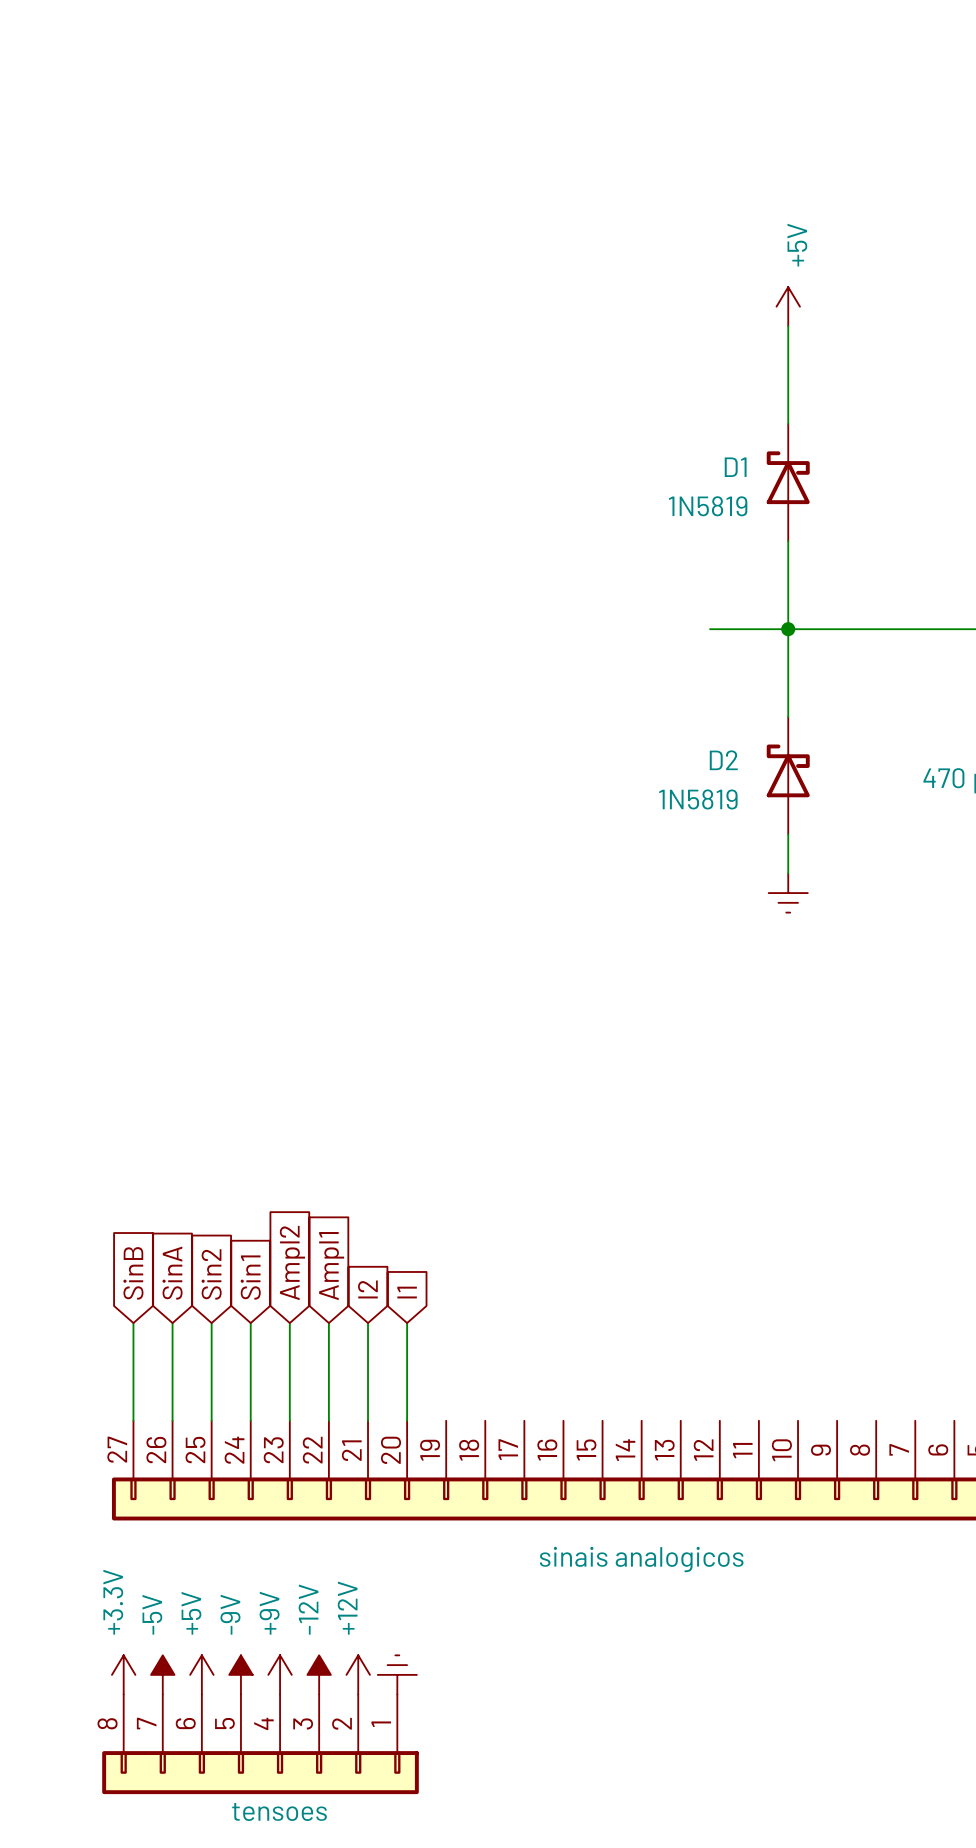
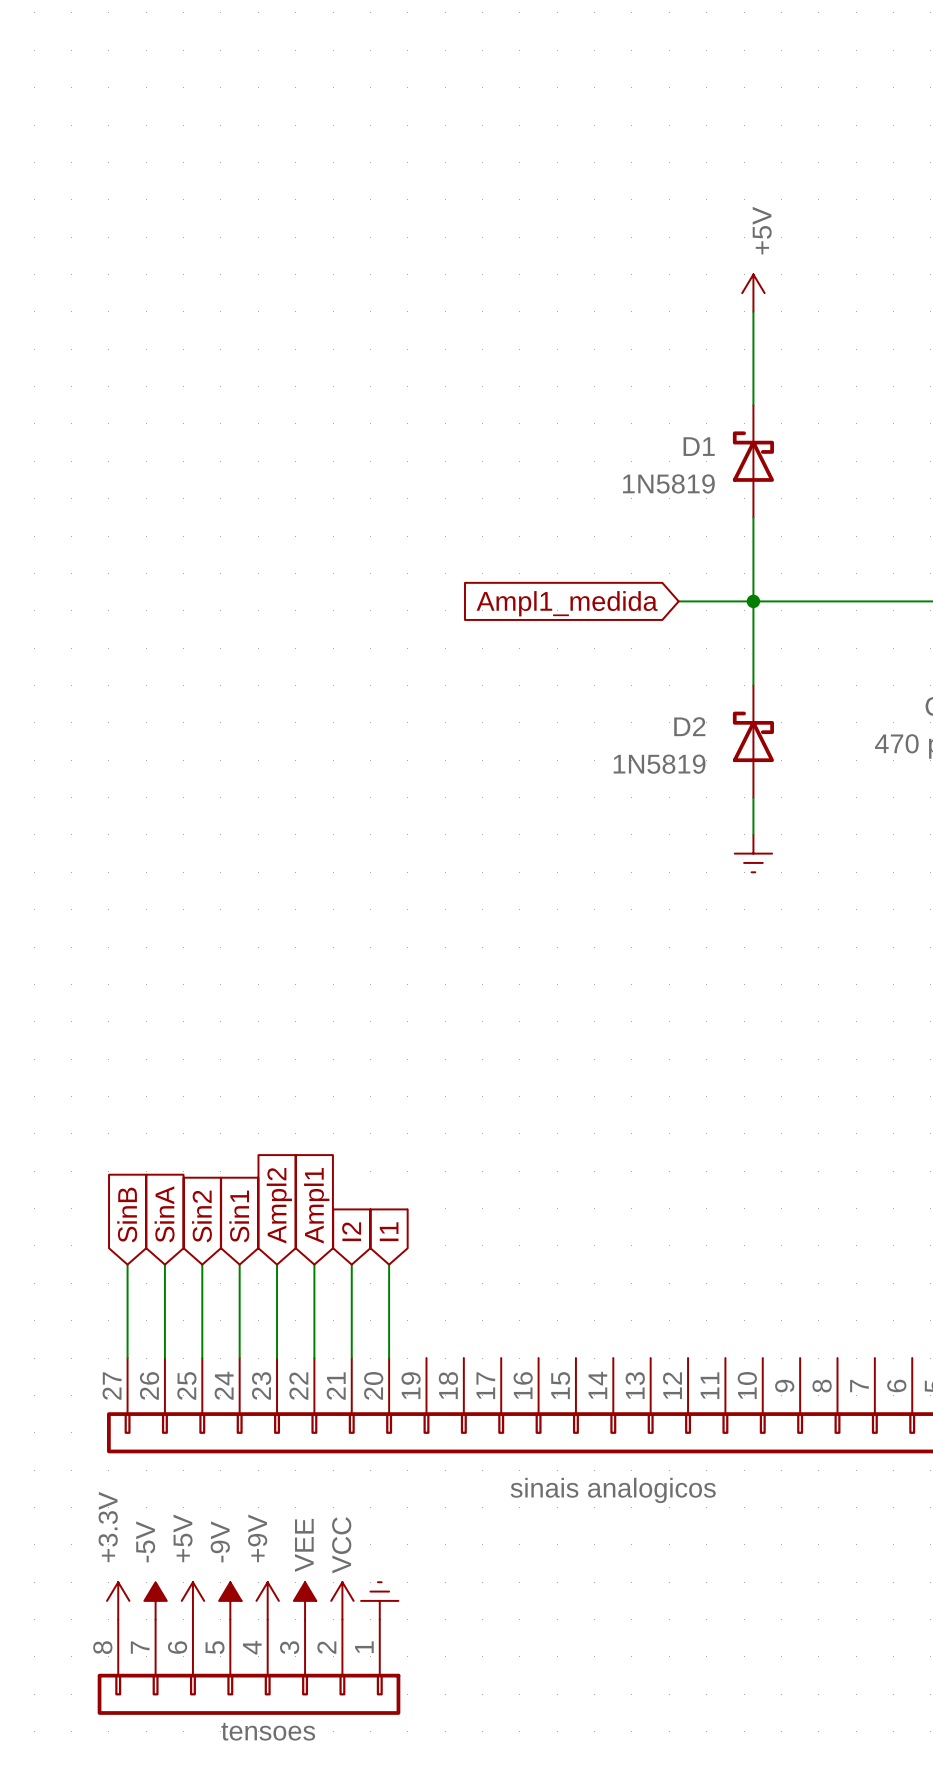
global label: none -> Ampl1_medida (567, 603)
power symbol: -12V (319, 1674) -> VEE (305, 1600)
power symbol: +12V (358, 1674) -> VCC (342, 1600)

